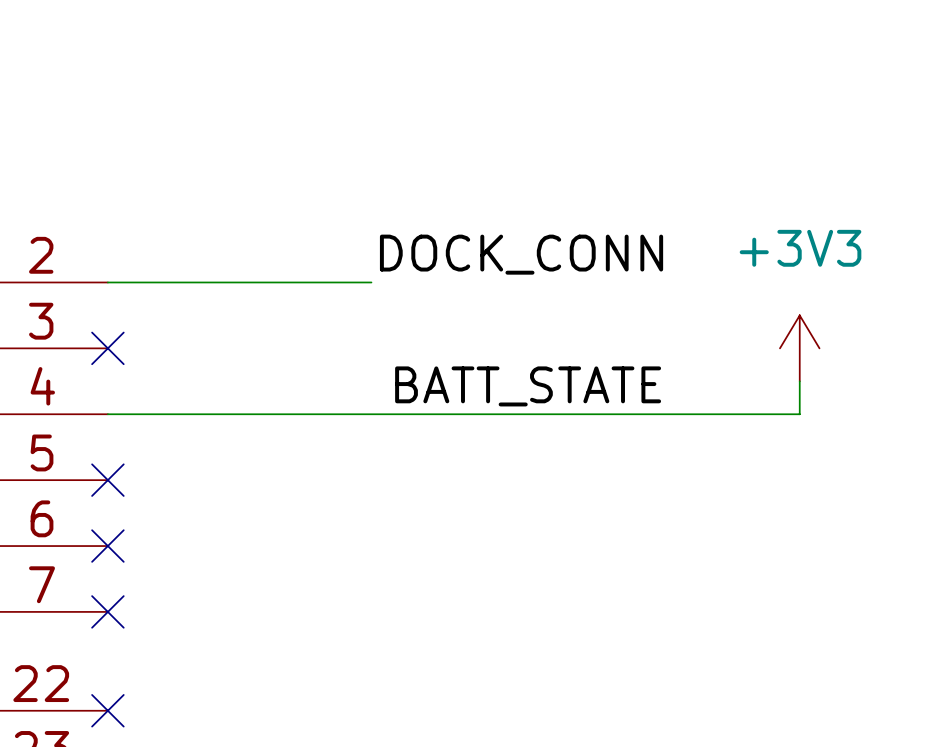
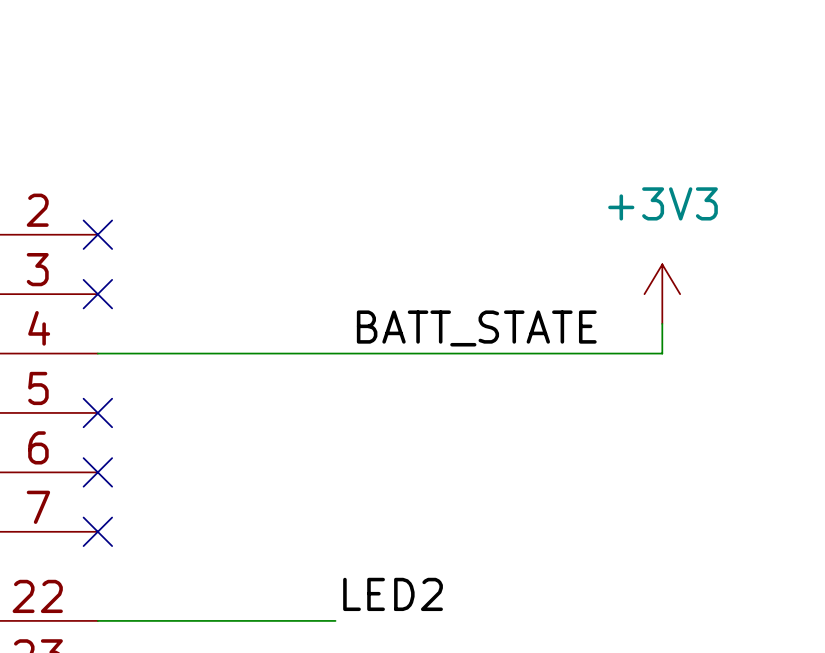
label: DOCK_CONN (521, 254) -> none
wire: (107, 282) (371, 282) -> (97, 620) (335, 620)
no-connect mark: none -> (97, 234)
power symbol position: +3V3 (799, 348) -> +3V3 (662, 294)
wire: (799, 381) (799, 414) (733, 414) -> (662, 323) (662, 353)
label: none -> LED2 (393, 594)
no-connect mark: (107, 710) -> none

